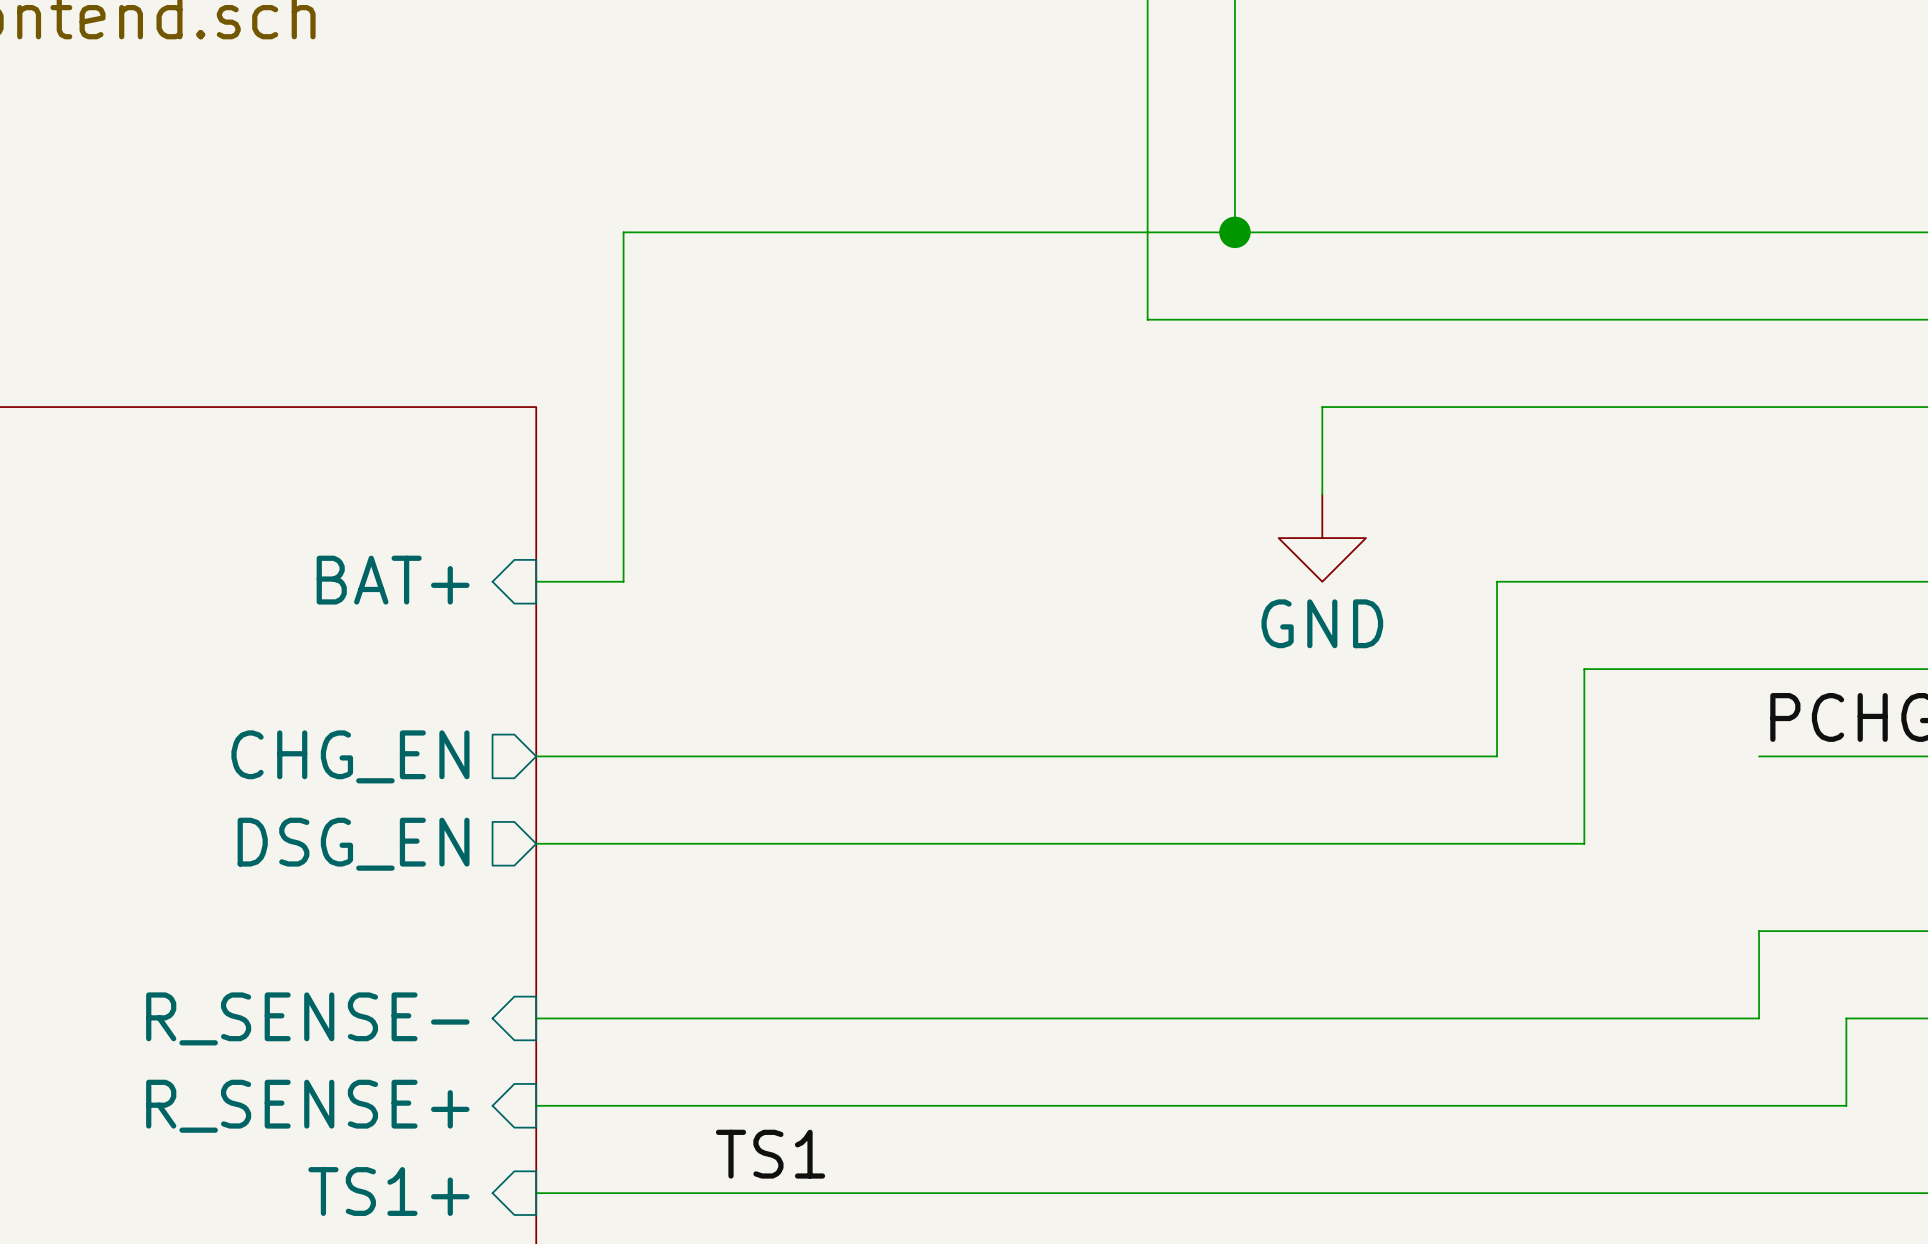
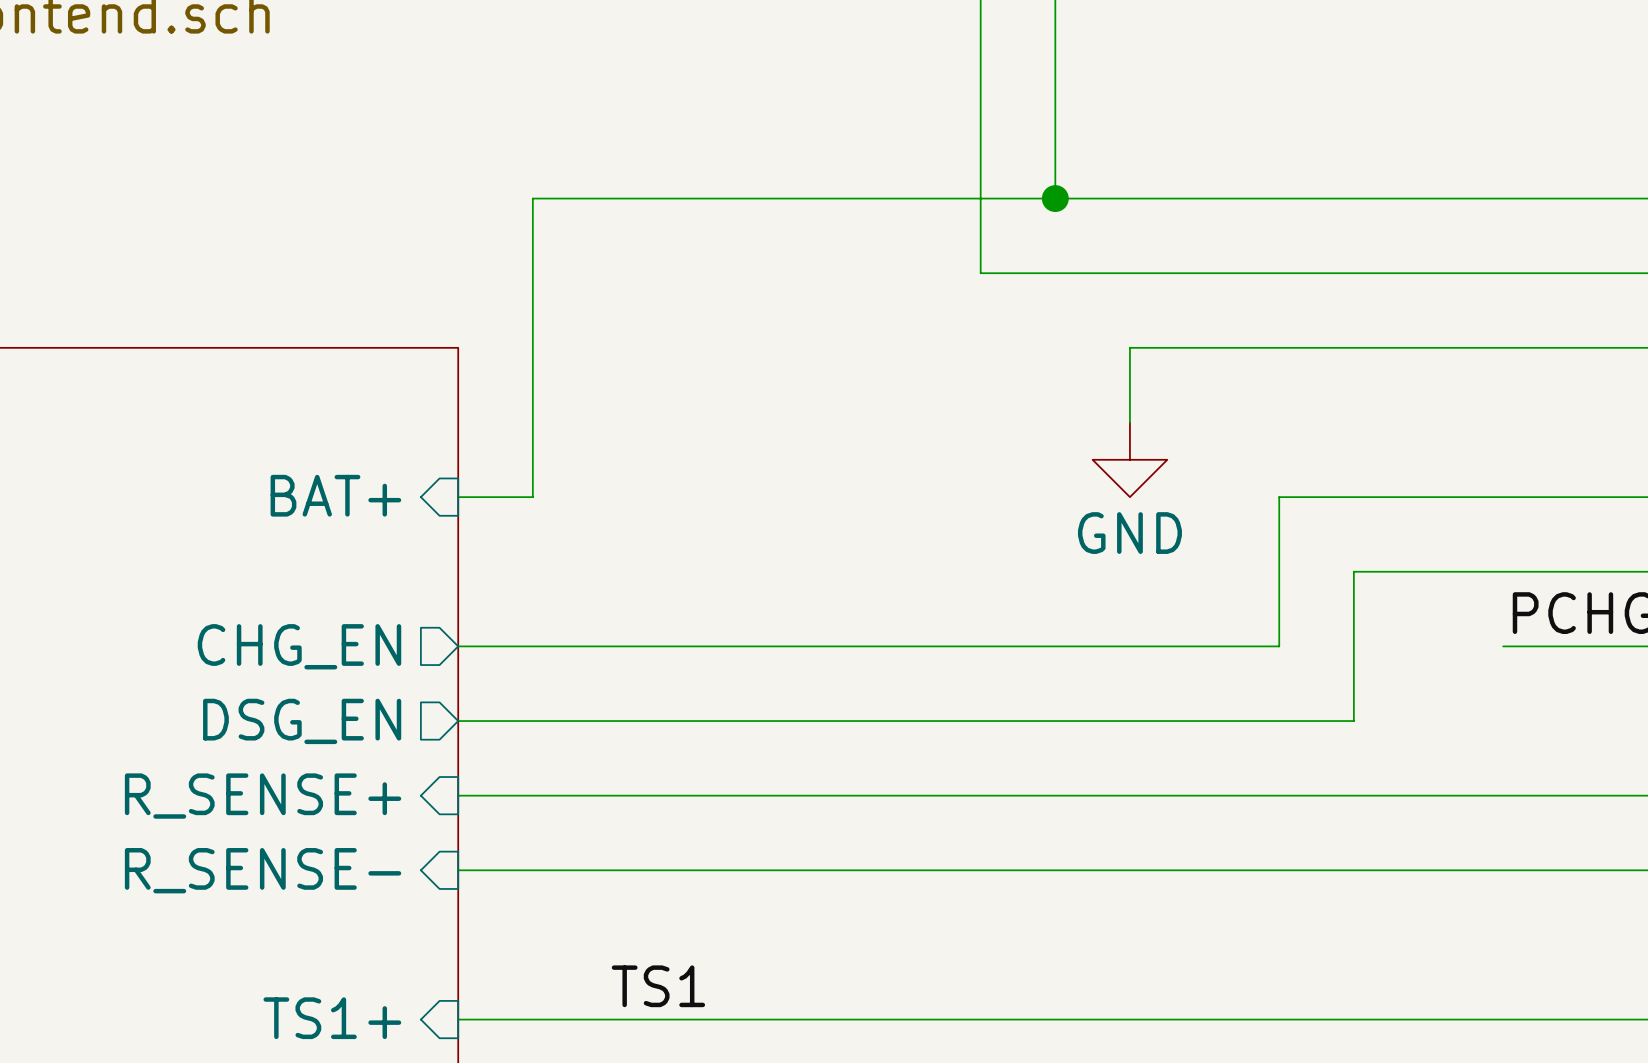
wire: none -> (458, 795) (1503, 795)
wire: (1759, 931) (1759, 1018) -> (1577, 870) (1503, 870)
wire: (1846, 1018) (1846, 1105) (536, 1105) -> none
sheet pin position: R_SENSE+ (307, 1106) -> R_SENSE+ (263, 796)

